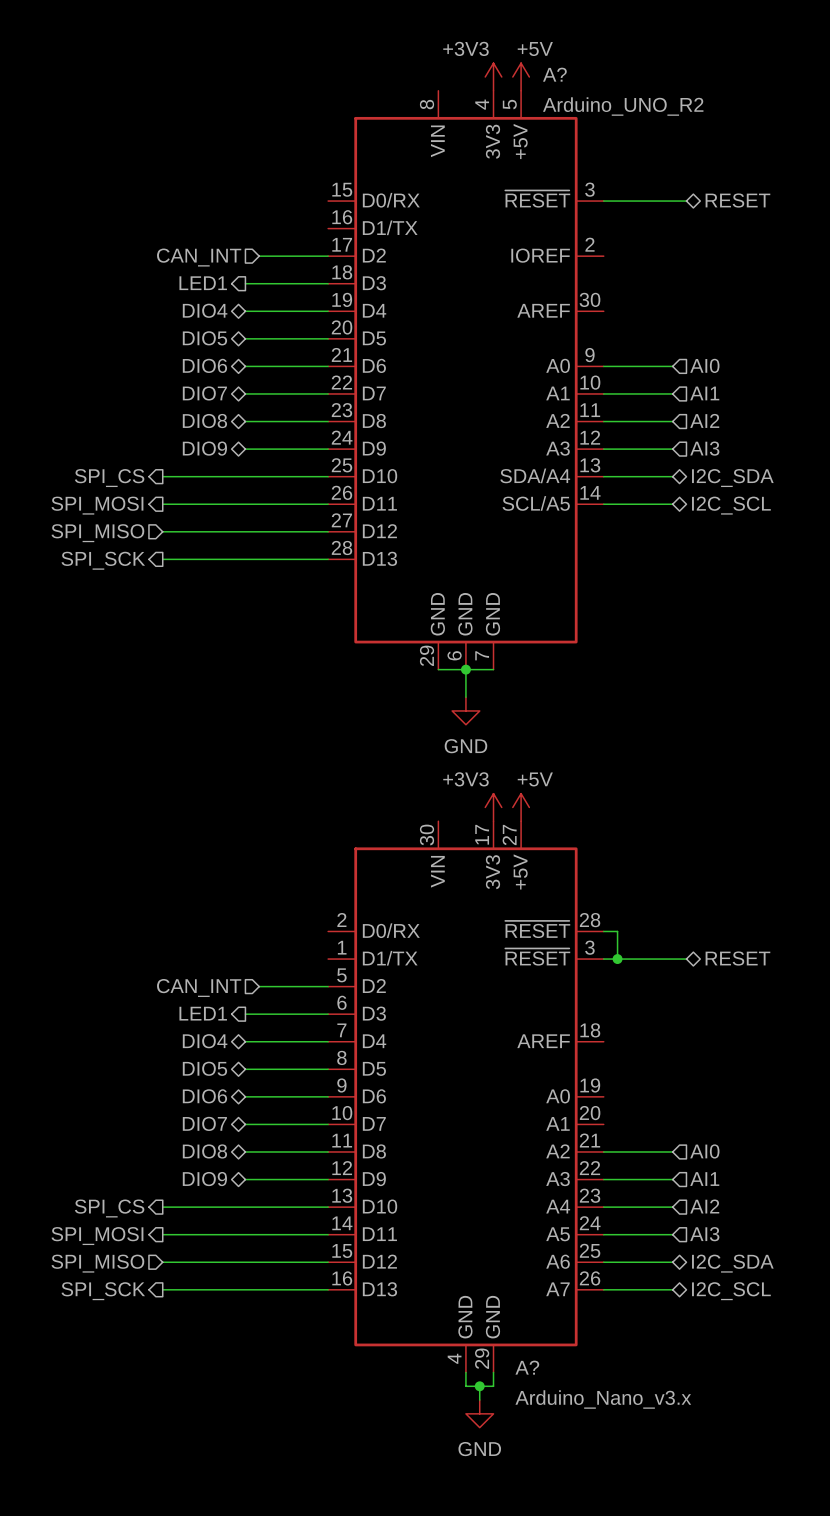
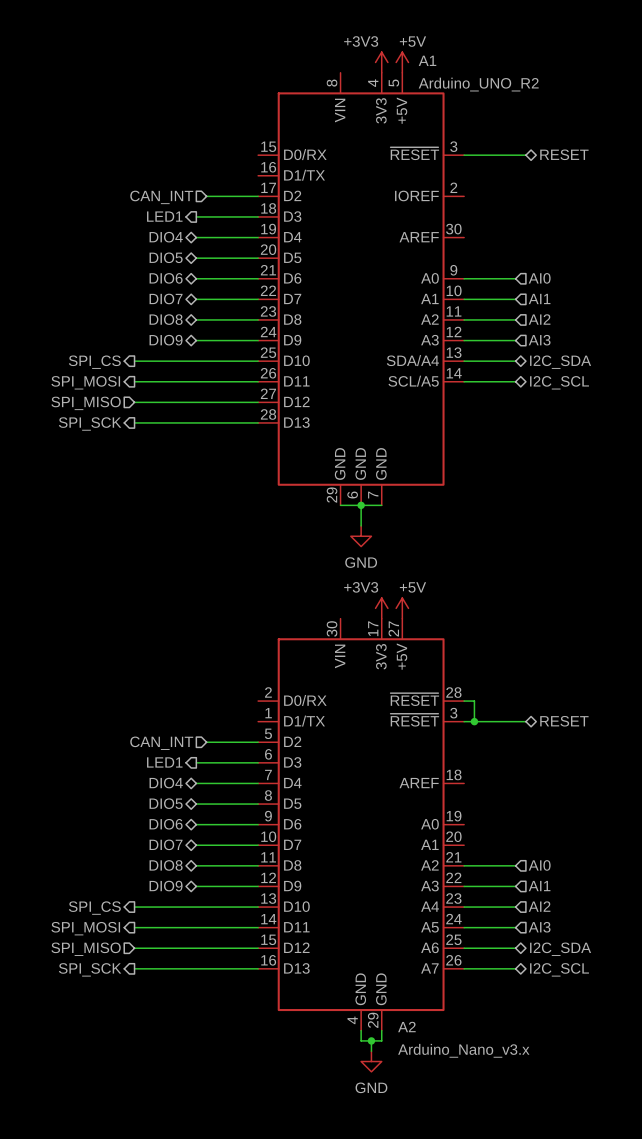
A? name: A? (554, 74) -> A1 (427, 60)
A? name: A? (527, 1367) -> A2 (406, 1027)

